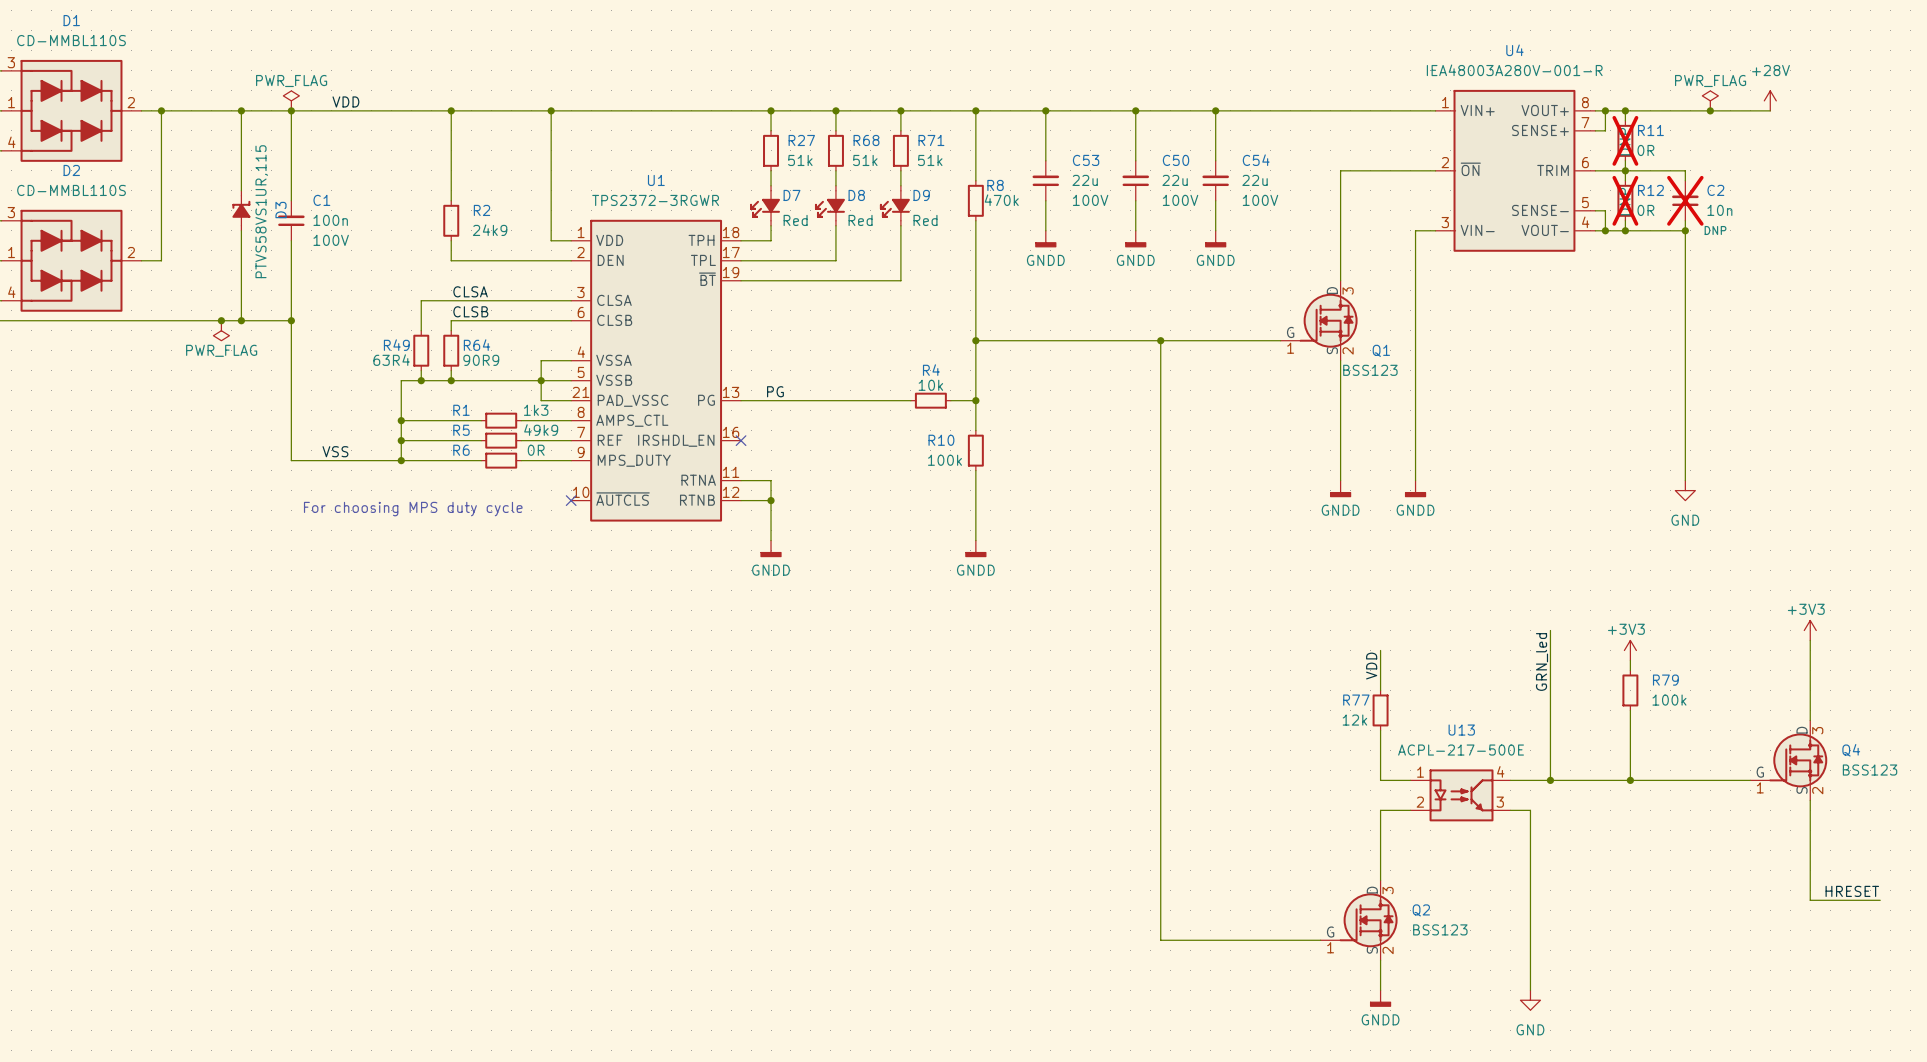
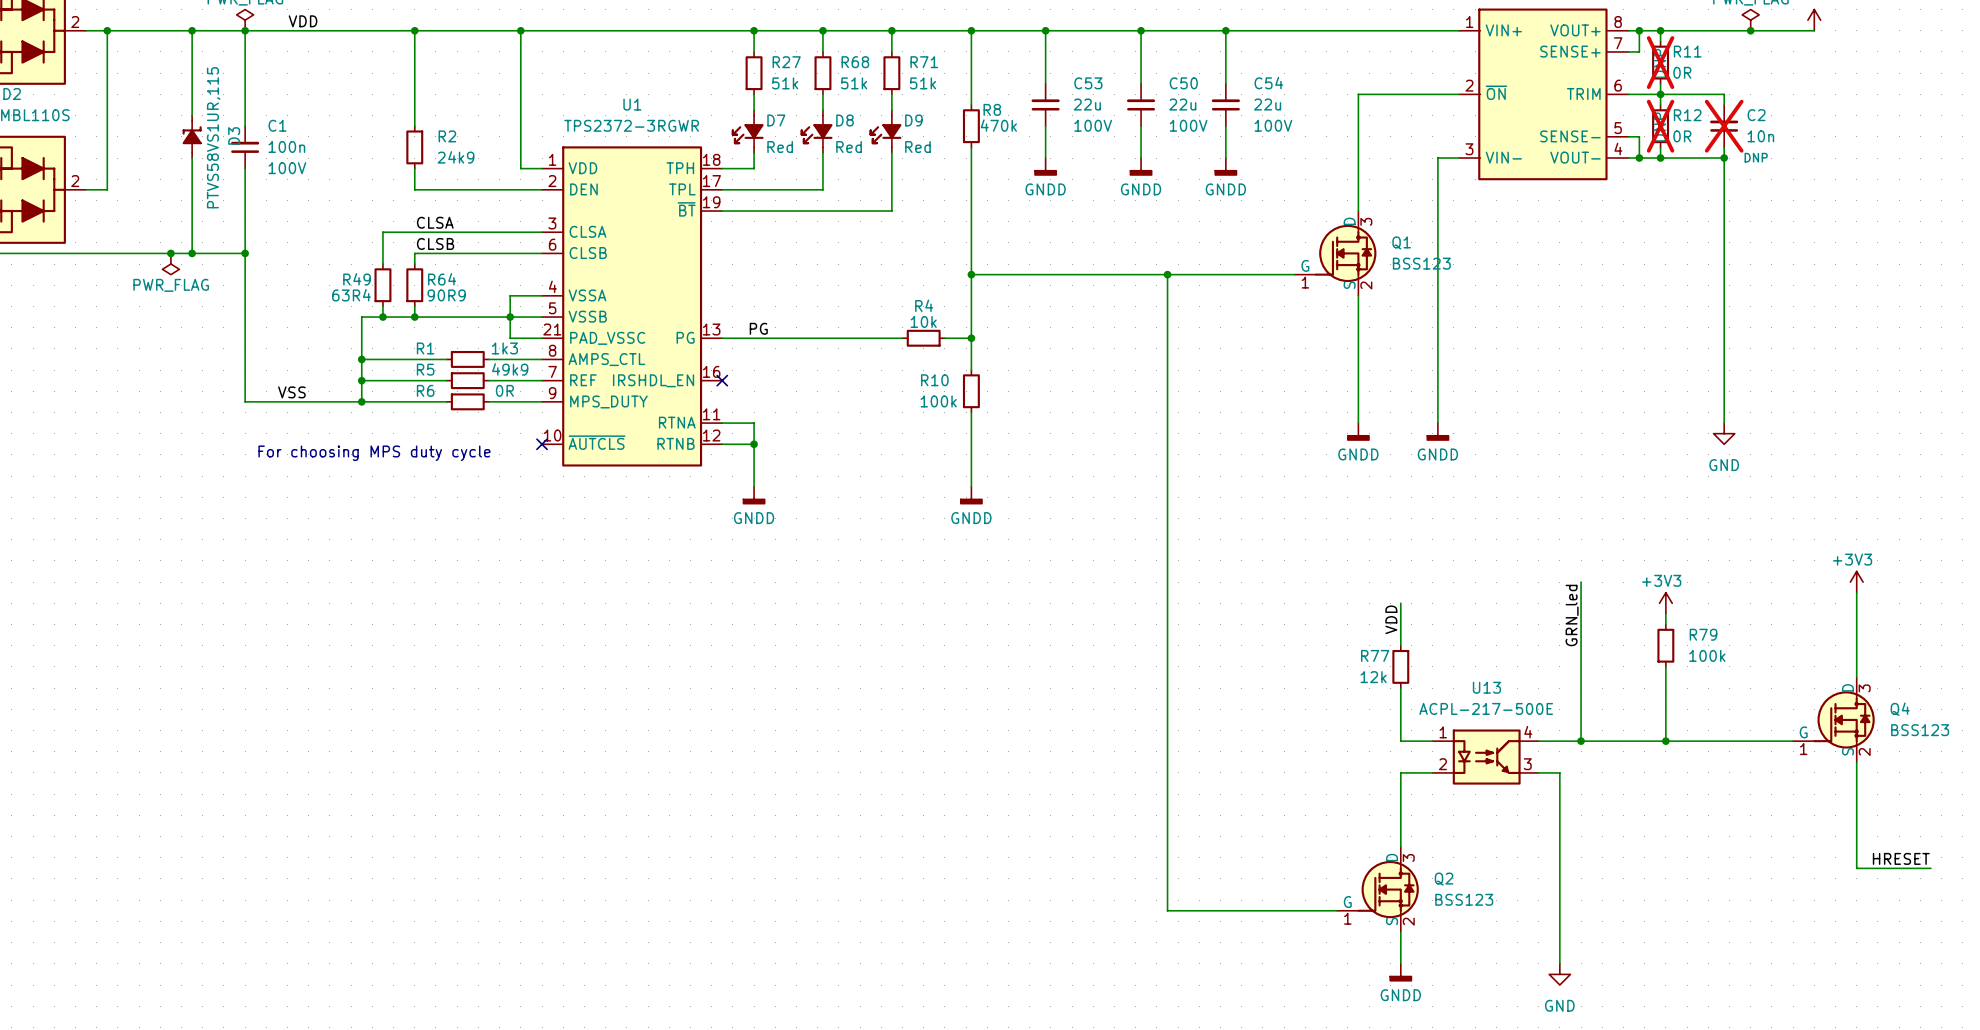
Q1 name position: Q1 (1381, 350) -> Q1 (1401, 242)
Q1 text position: BSS123 (1370, 370) -> BSS123 (1421, 263)

